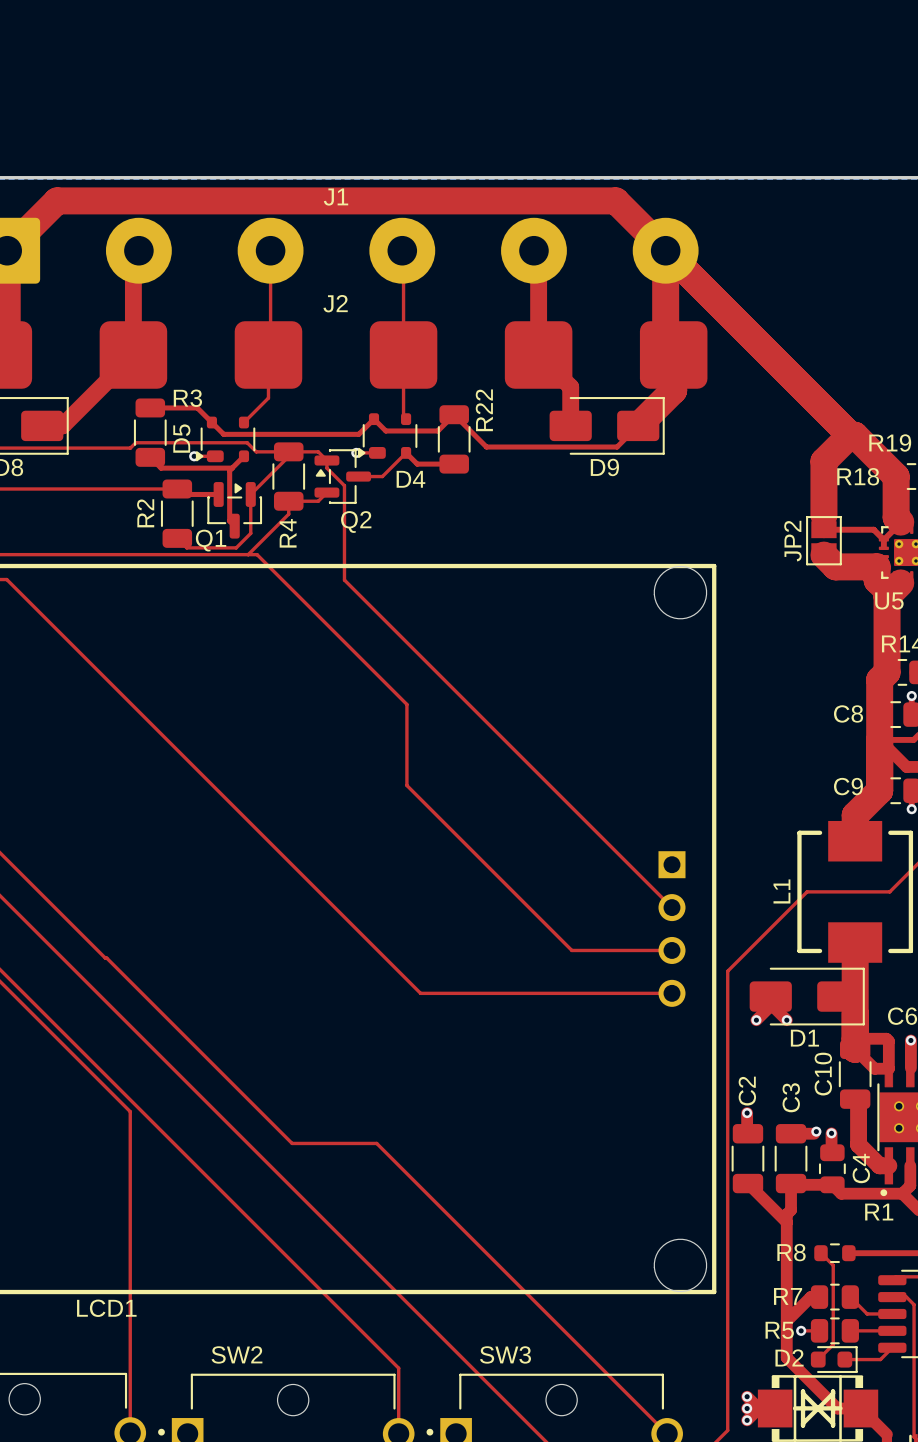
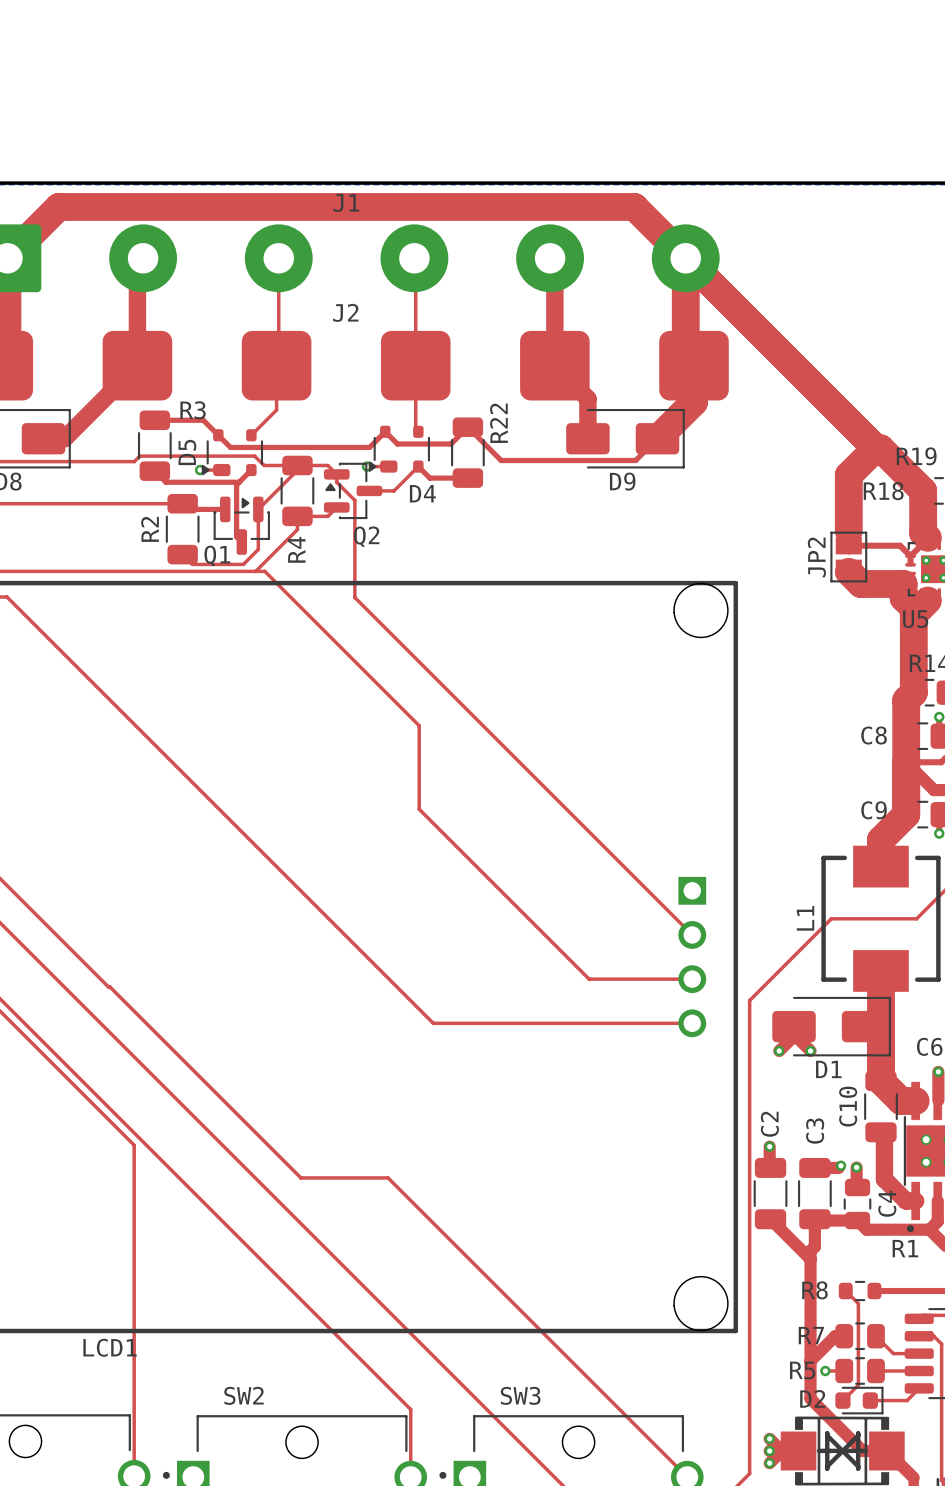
top track: (855, 1038) (886, 1038) (888, 1041) (888, 1068) -> none
top track width: thin (855, 1049) (874, 1068) (888, 1068) -> thick (880, 1080) (900, 1100) (915, 1100)

